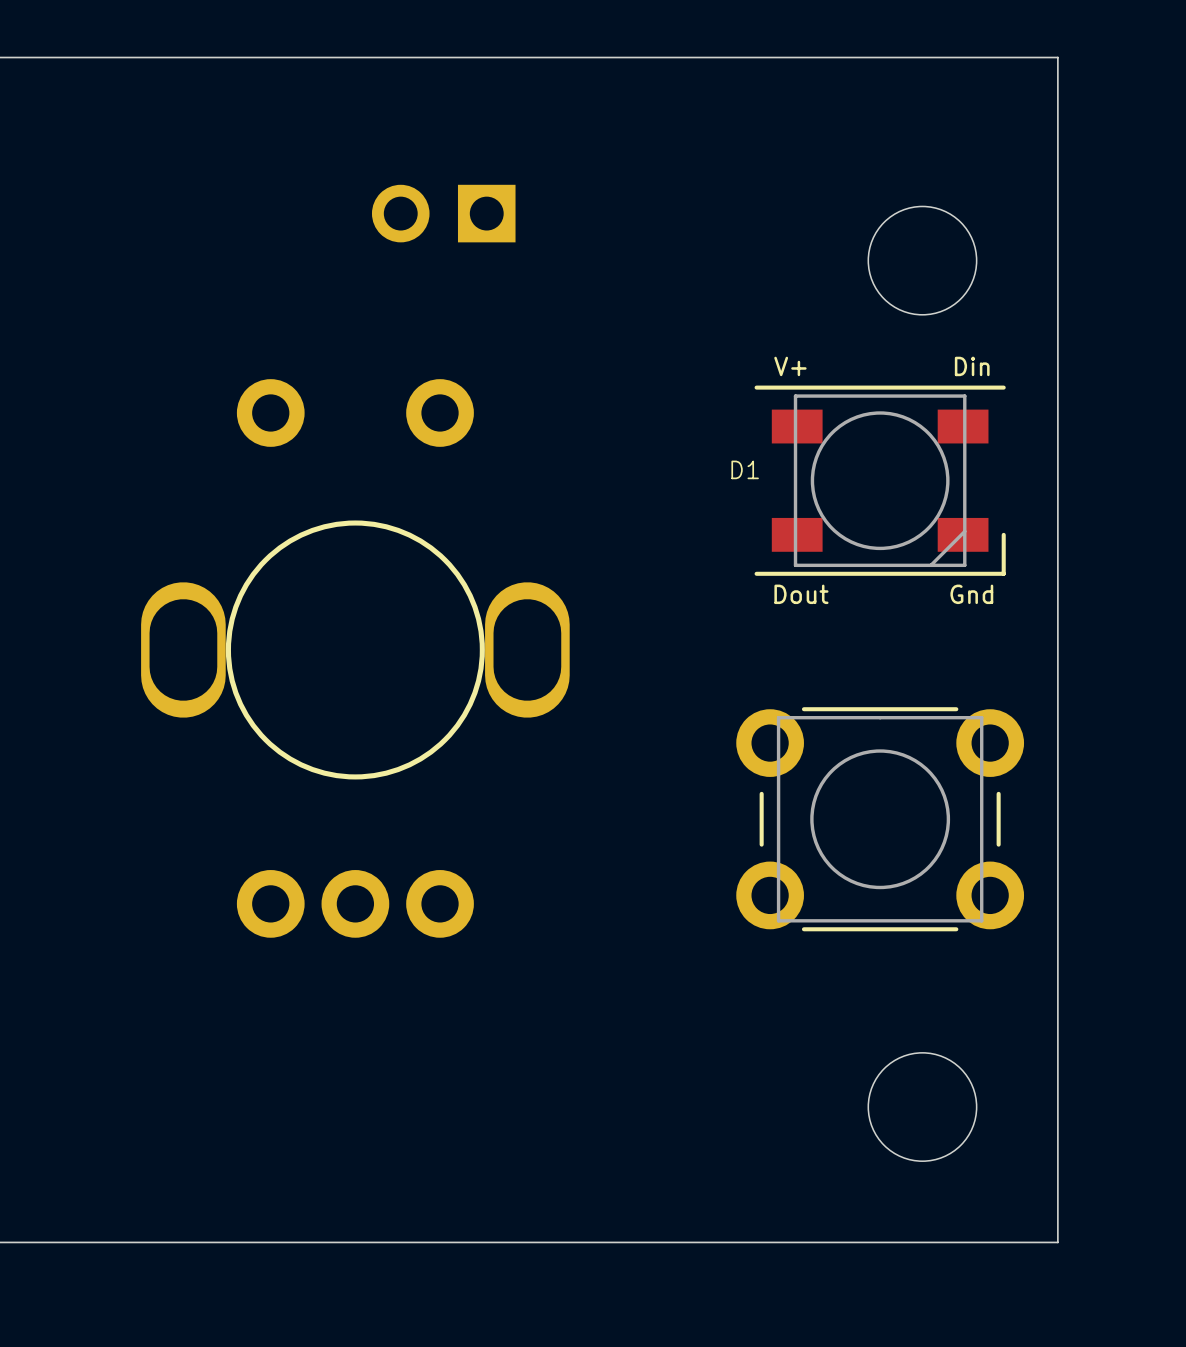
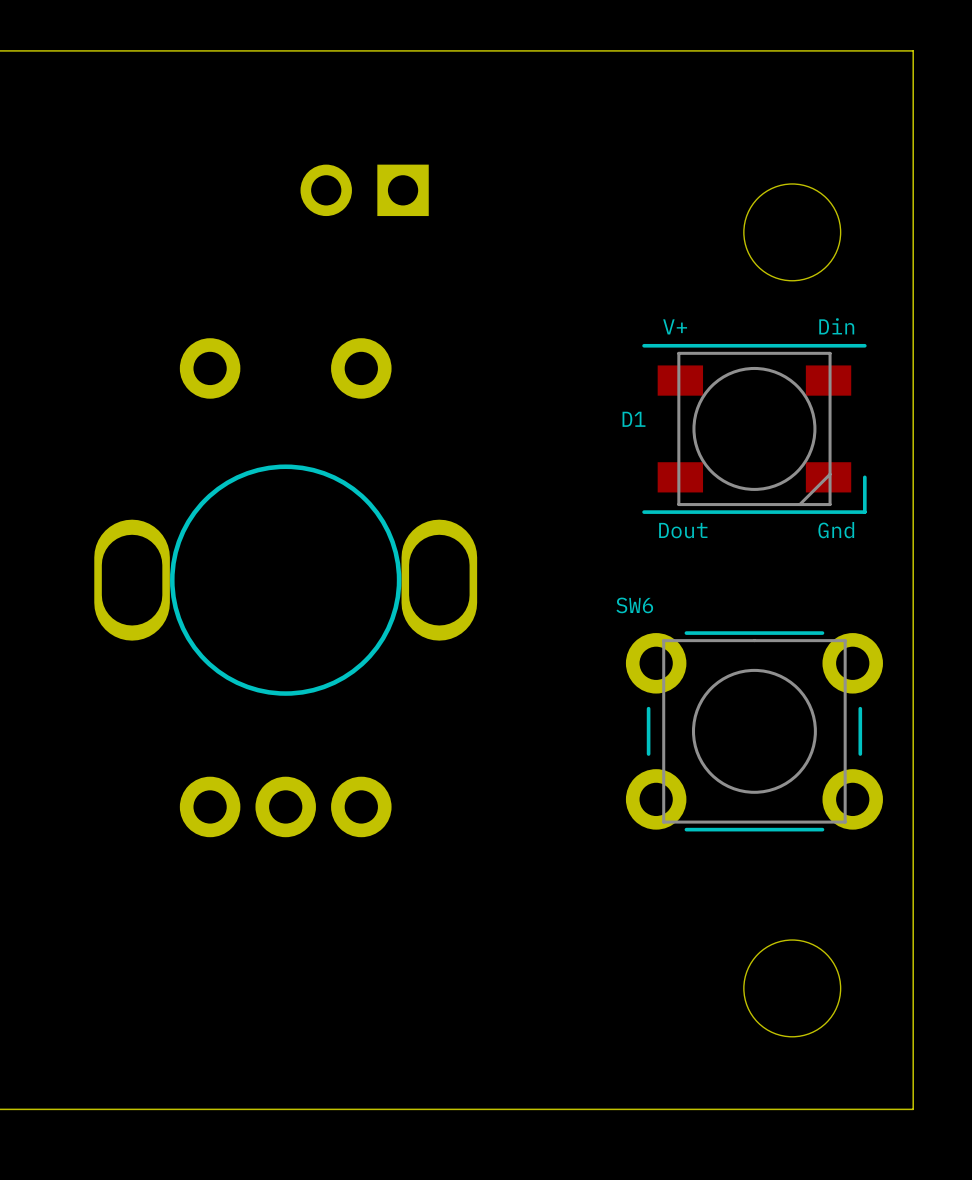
SW6 name: none -> SW6 (634, 605)

